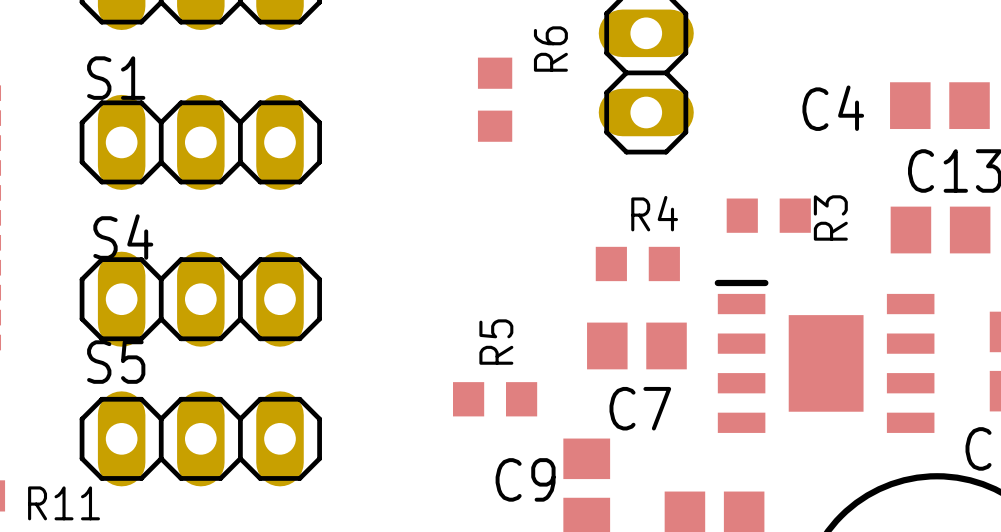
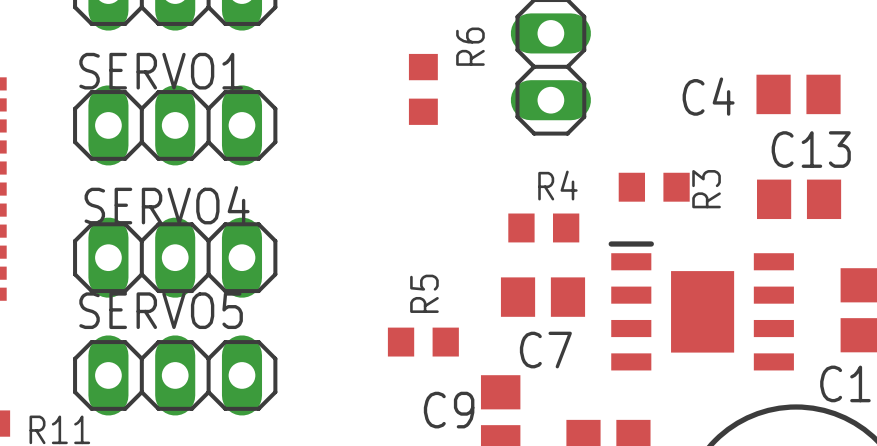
S1 name: S1 (116, 78) -> SERVO1 (161, 71)
S4 name: S4 (123, 237) -> SERVO4 (167, 205)
S5 name: S5 (116, 362) -> SERVO5 (161, 310)

